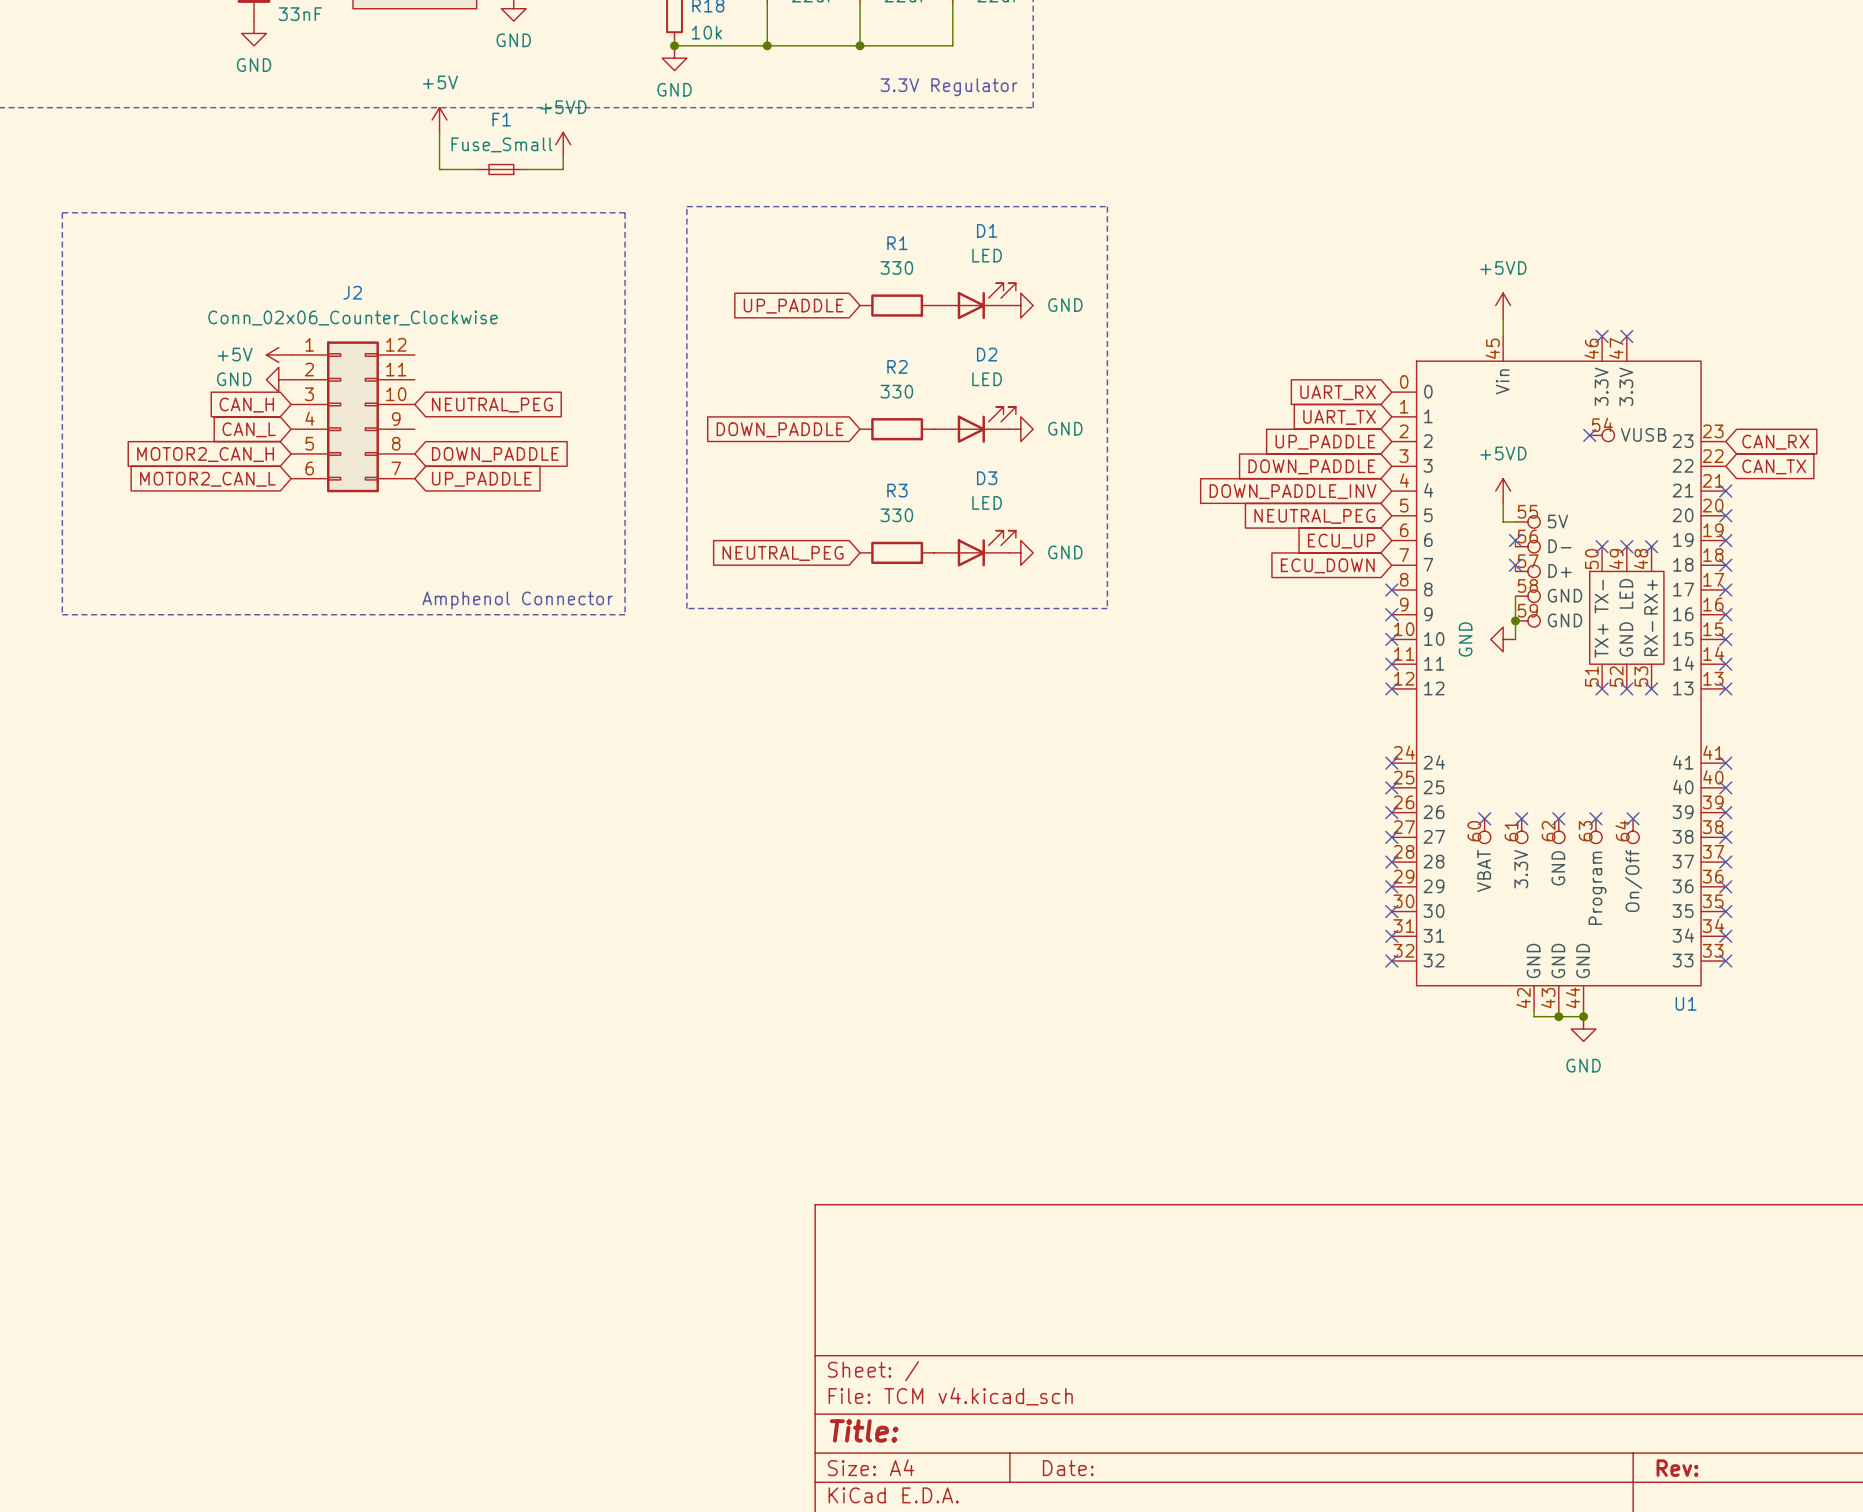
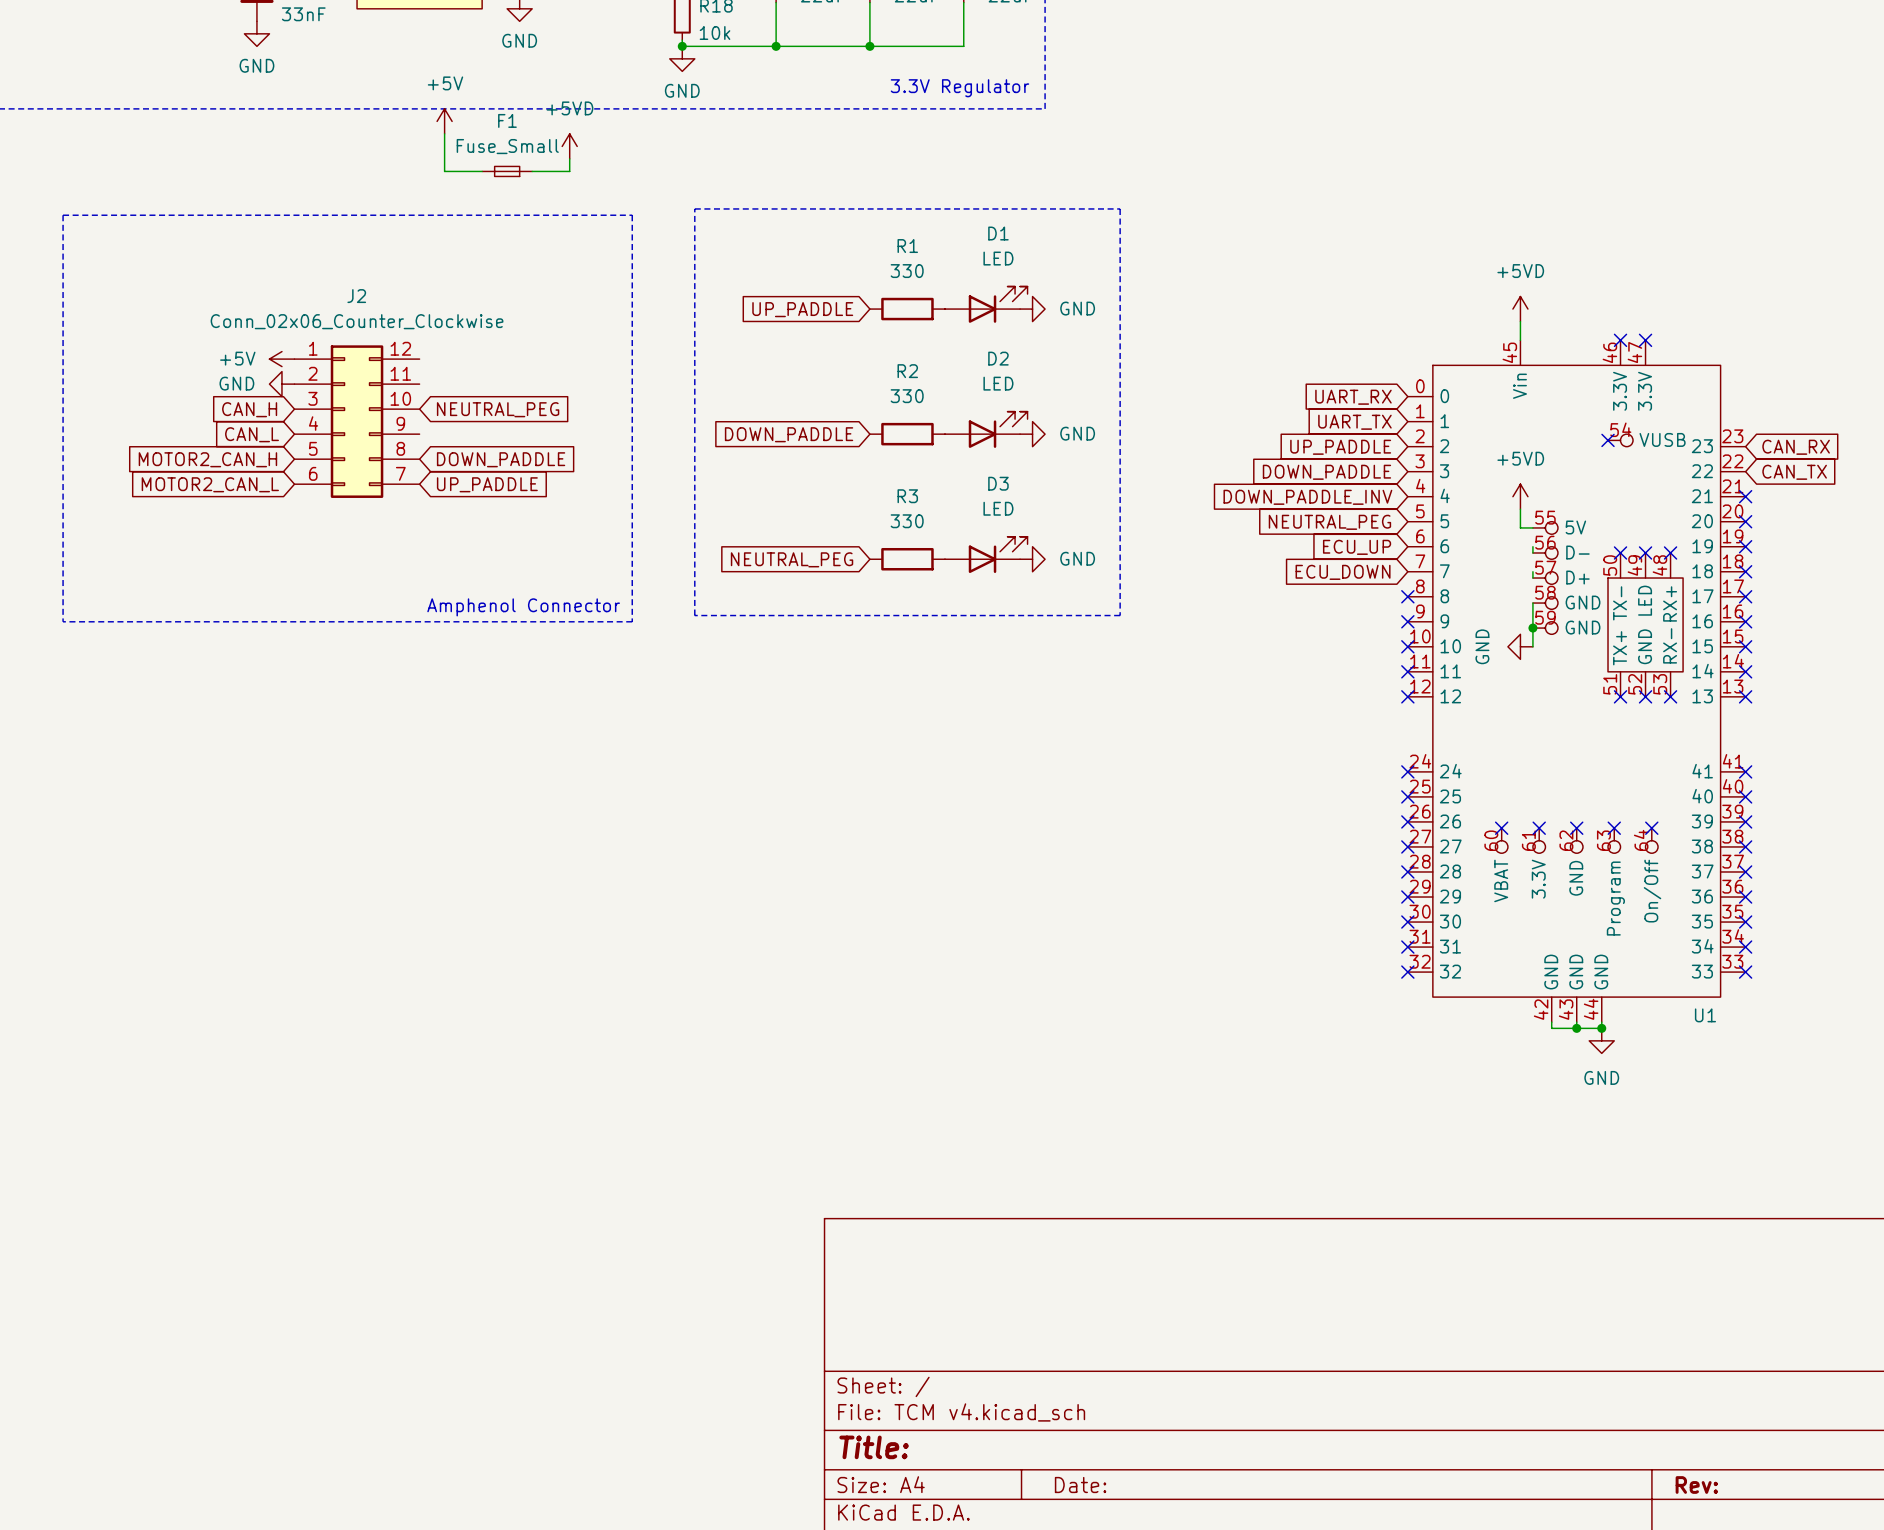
no-connect mark: (1515, 540) -> none
no-connect mark: (1515, 565) -> none

